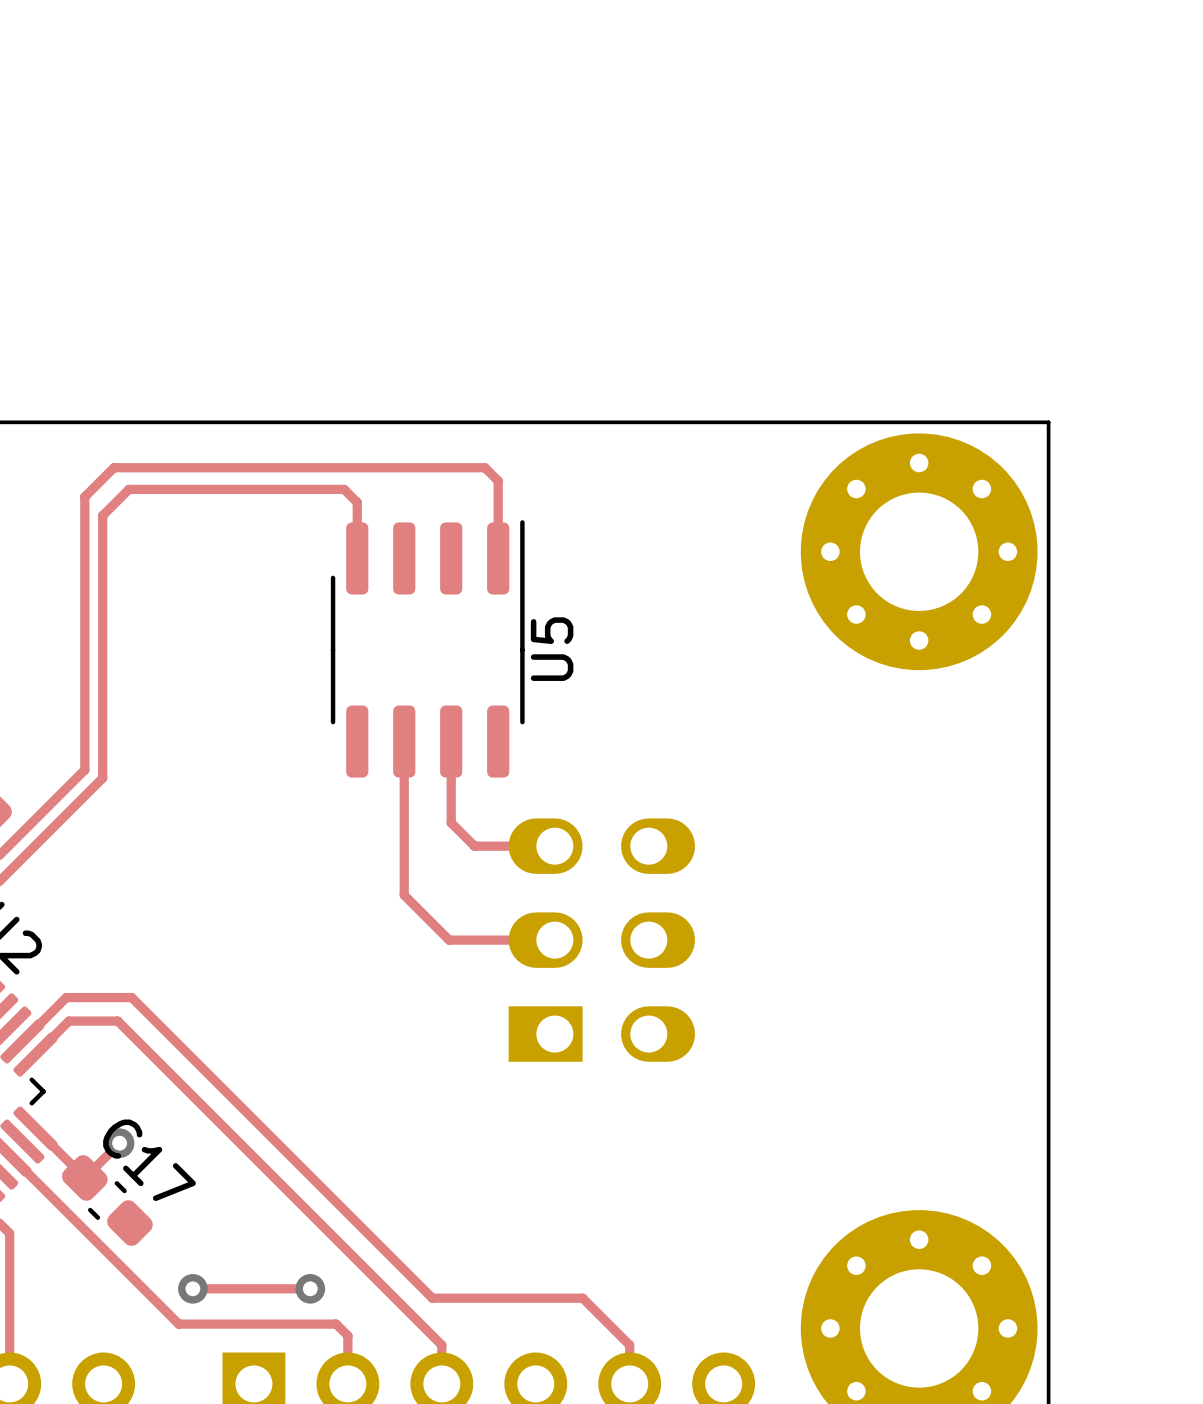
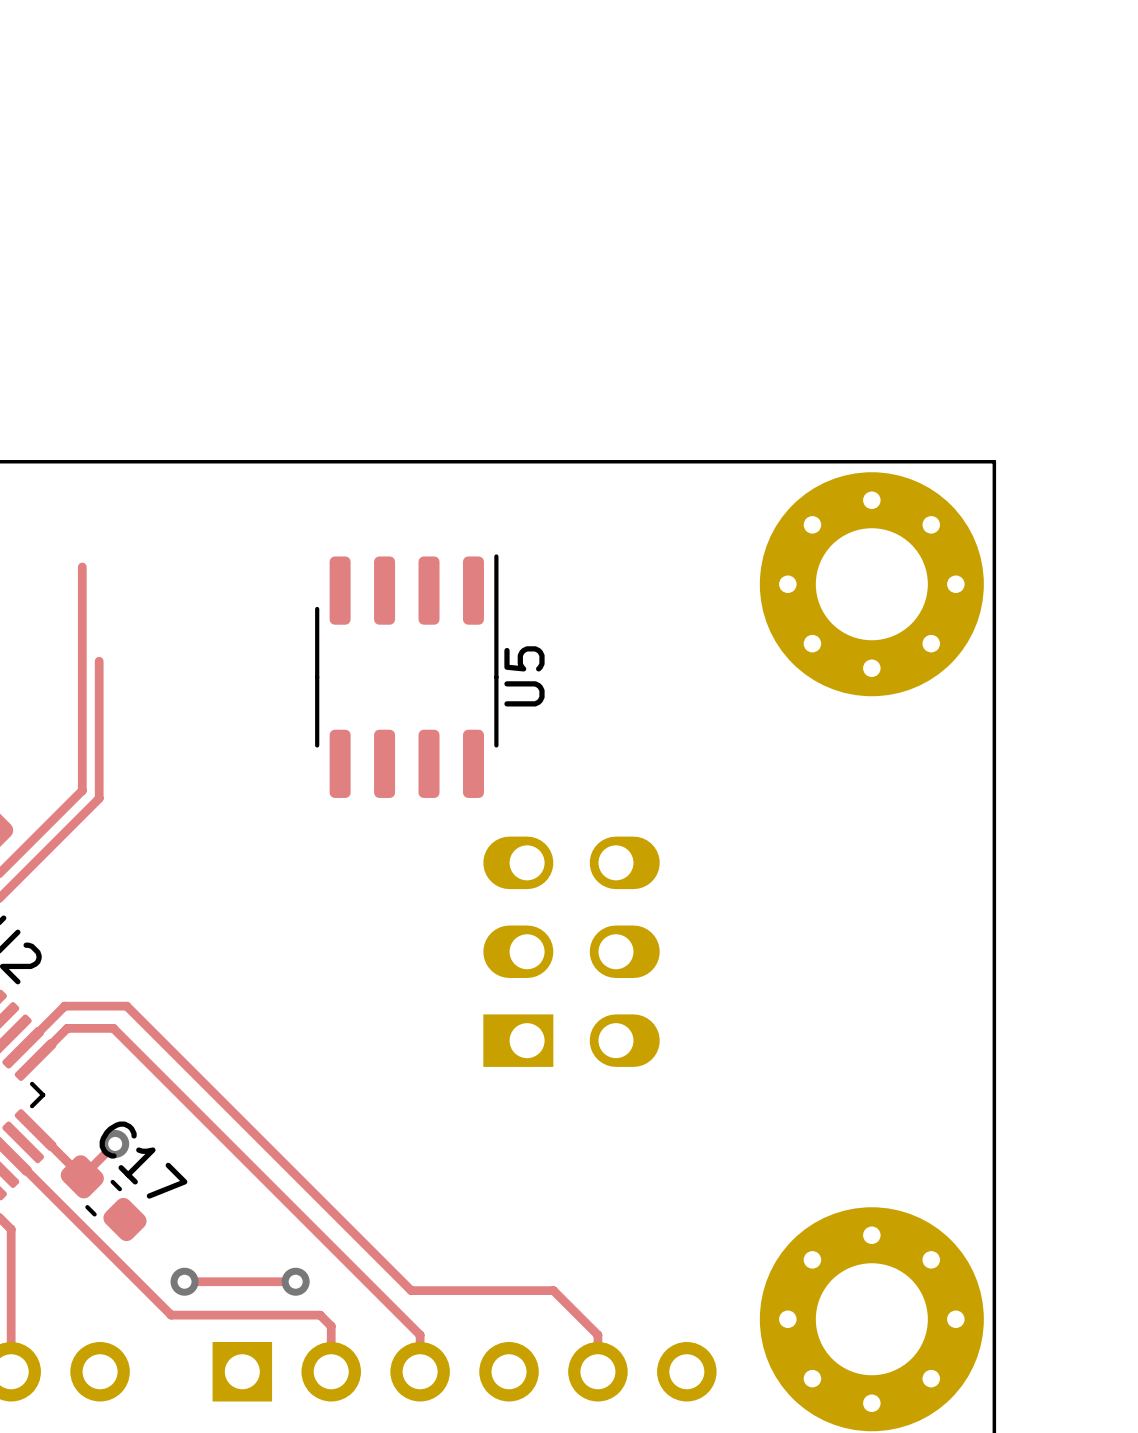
track: (84, 533) (84, 496) (113, 467) (485, 467) (498, 480) (498, 558) -> none
track: (357, 558) (357, 502) (344, 489) (128, 489) (102, 515) (102, 633) -> none
track: (404, 741) (404, 895) (449, 940) (554, 940) -> none
track: (451, 741) (451, 822) (474, 846) (554, 846) -> none

